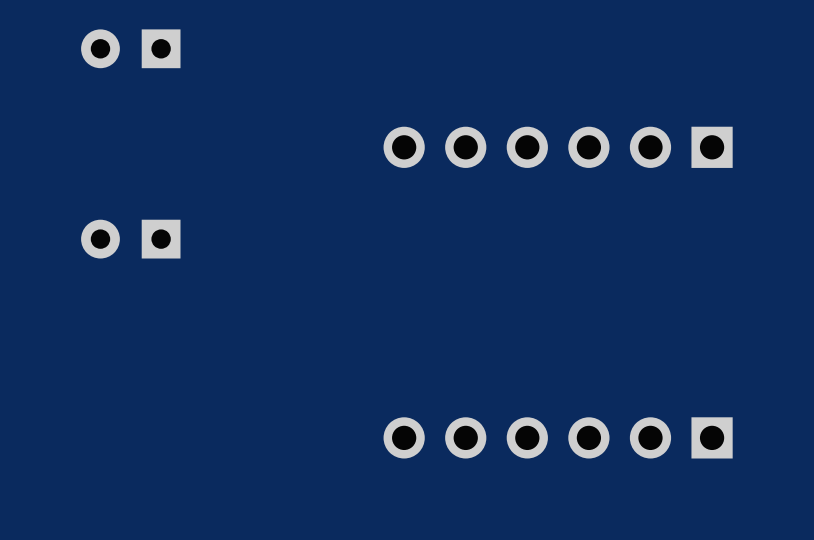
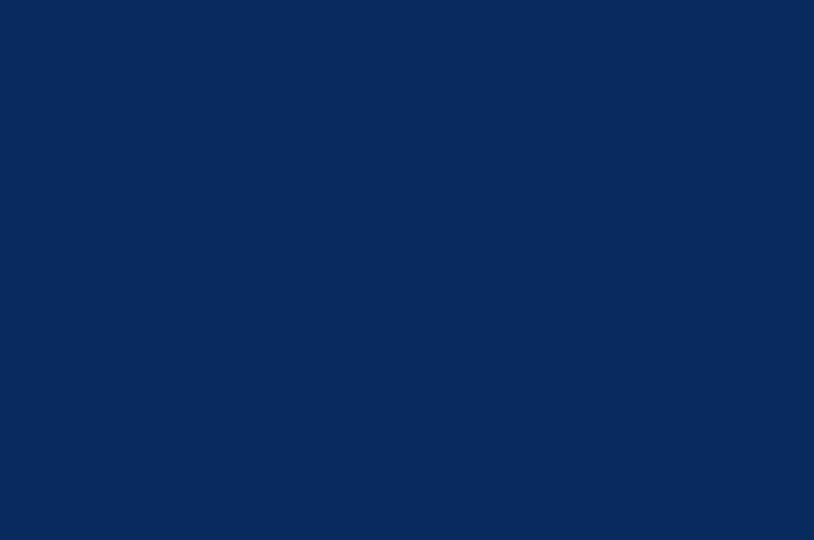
part: (130, 48) -> none
part: (558, 147) -> none
part: (130, 239) -> none
part: (558, 437) -> none

